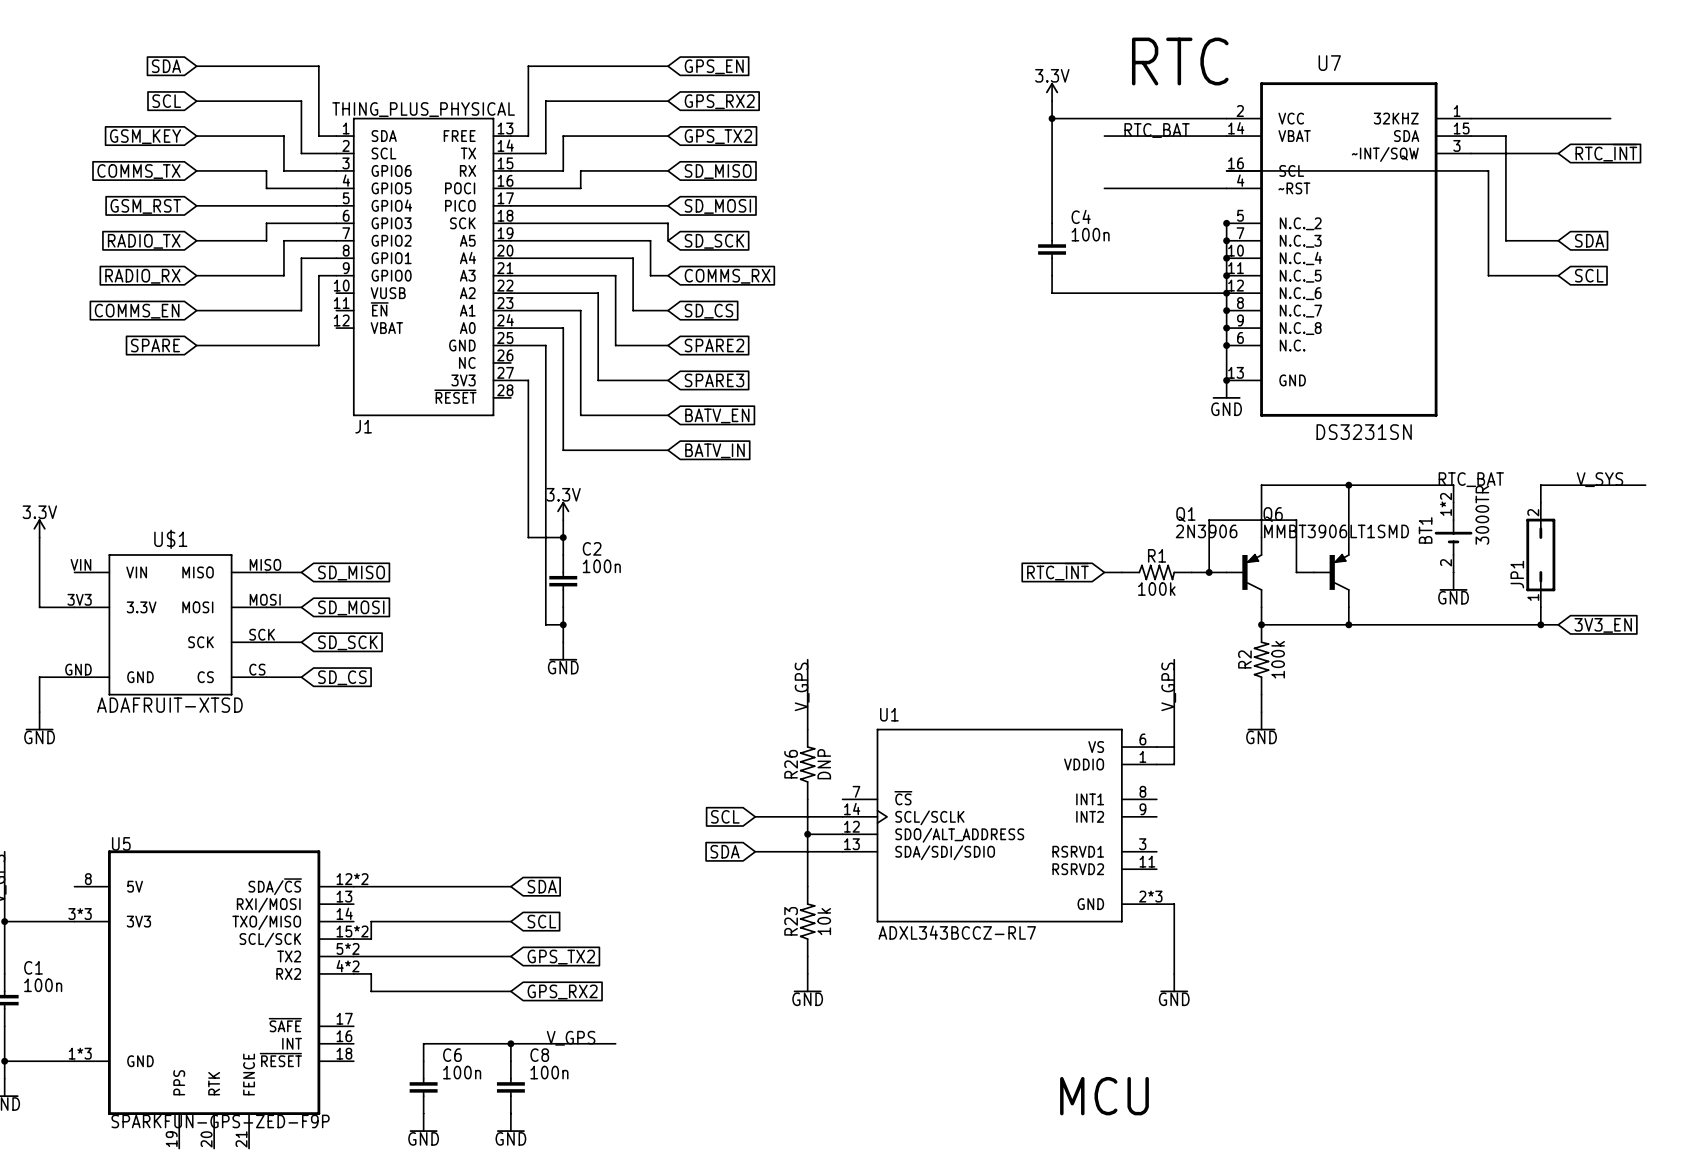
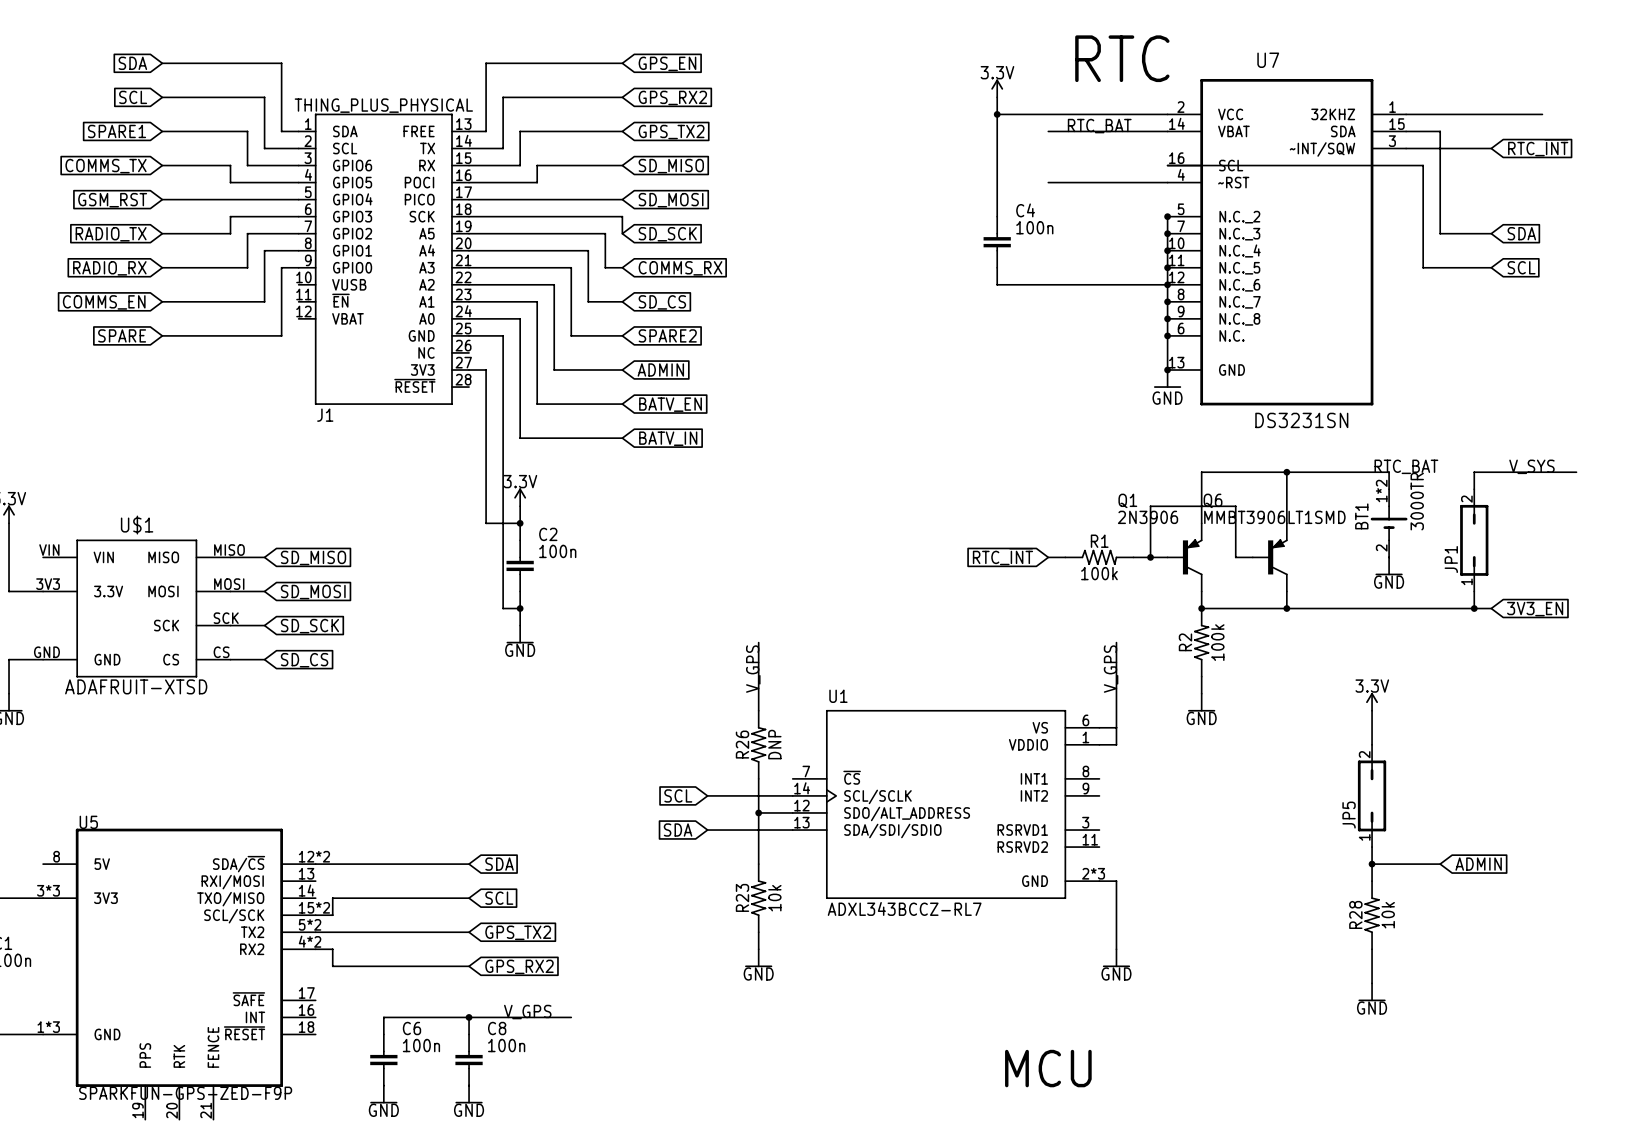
global label: GSM_KEY (145, 136) -> SPARE1 (117, 131)
global label: SPARE3 (714, 380) -> ADMIN (660, 369)
power symbol: none -> 3.3V (1372, 701)
wire: none -> (1372, 710) (1372, 744)
JP5: none -> (1372, 795)
wire: none -> (1372, 847) (1372, 881)
wire: none -> (1372, 864) (1440, 864)
junction: none -> (1372, 864)
global label: none -> ADMIN (1478, 864)
R28: none -> 10k (1372, 915)
wire: none -> (1372, 949) (1372, 983)
power symbol: none -> GND (1372, 992)

